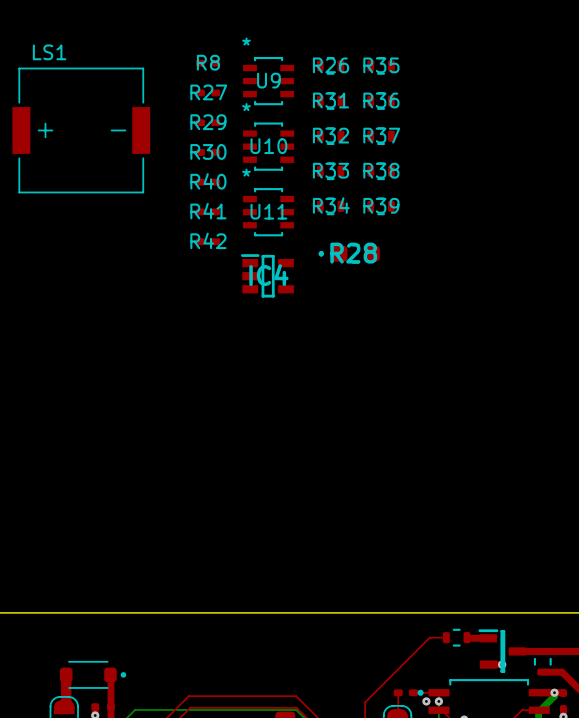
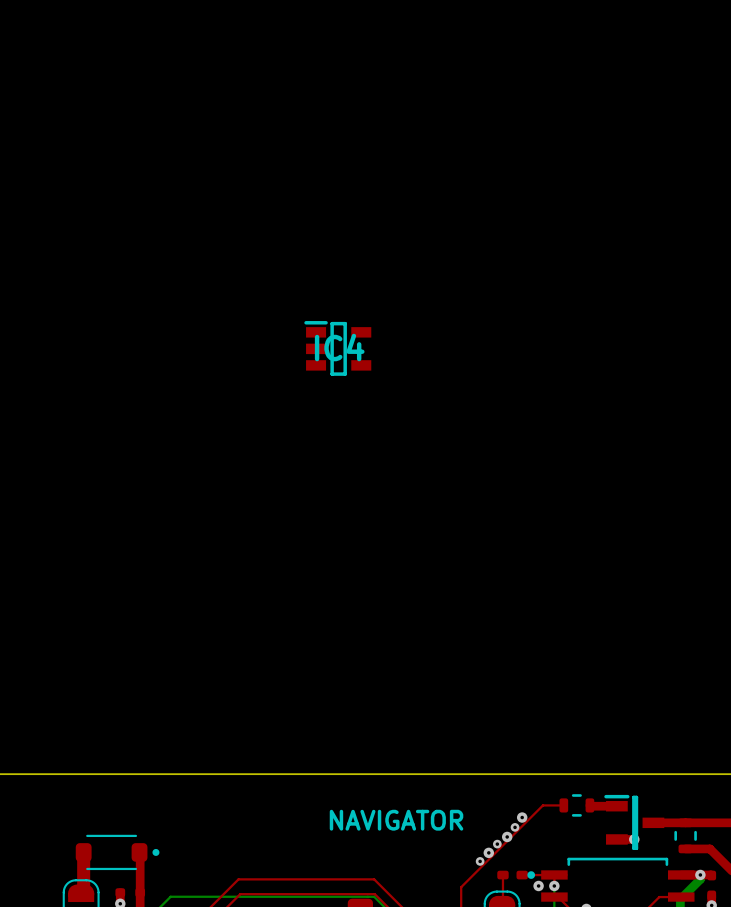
R8: (208, 63) -> none
R26: (330, 65) -> none
R35: (381, 65) -> none
U9: (268, 81) -> none
R27: (208, 92) -> none
R31: (330, 100) -> none
R36: (381, 100) -> none
R29: (208, 122) -> none
LS1: (81, 130) -> none
R32: (330, 136) -> none
R37: (381, 136) -> none
U10: (268, 146) -> none
R30: (208, 152) -> none
R33: (330, 171) -> none
R38: (381, 171) -> none
R40: (208, 182) -> none
R34: (330, 206) -> none
R39: (381, 206) -> none
R41: (208, 211) -> none
U11: (268, 212) -> none
R42: (208, 241) -> none
R28: (349, 253) -> none
via: none -> (522, 817)
text: none -> NAVIGATOR (396, 820)
via: none -> (515, 827)
via: none -> (507, 836)
via: none -> (497, 844)
via: none -> (488, 852)
via: none -> (480, 861)

